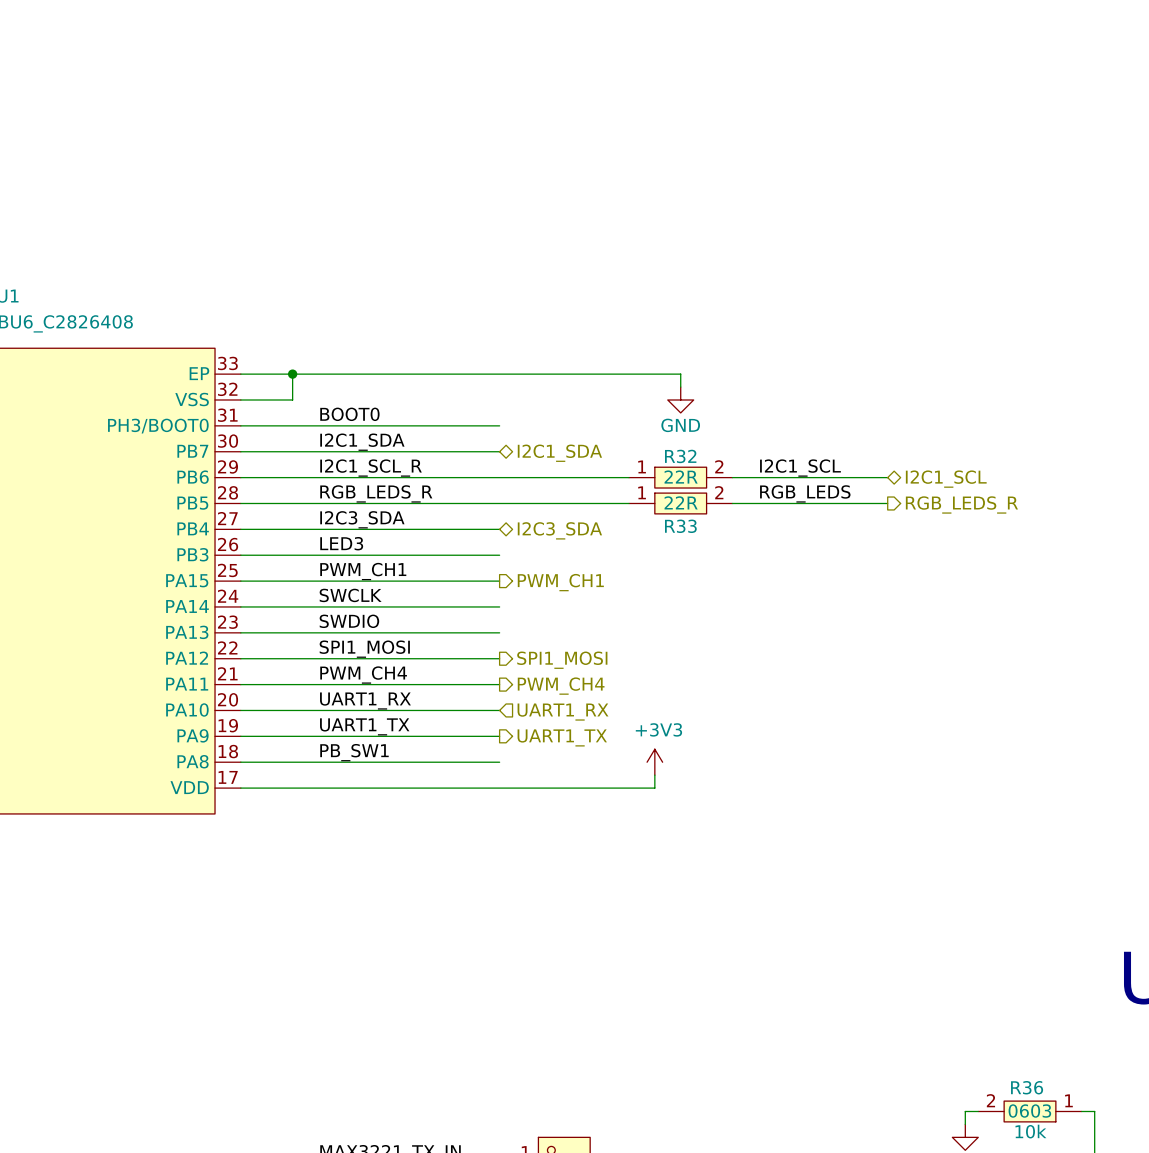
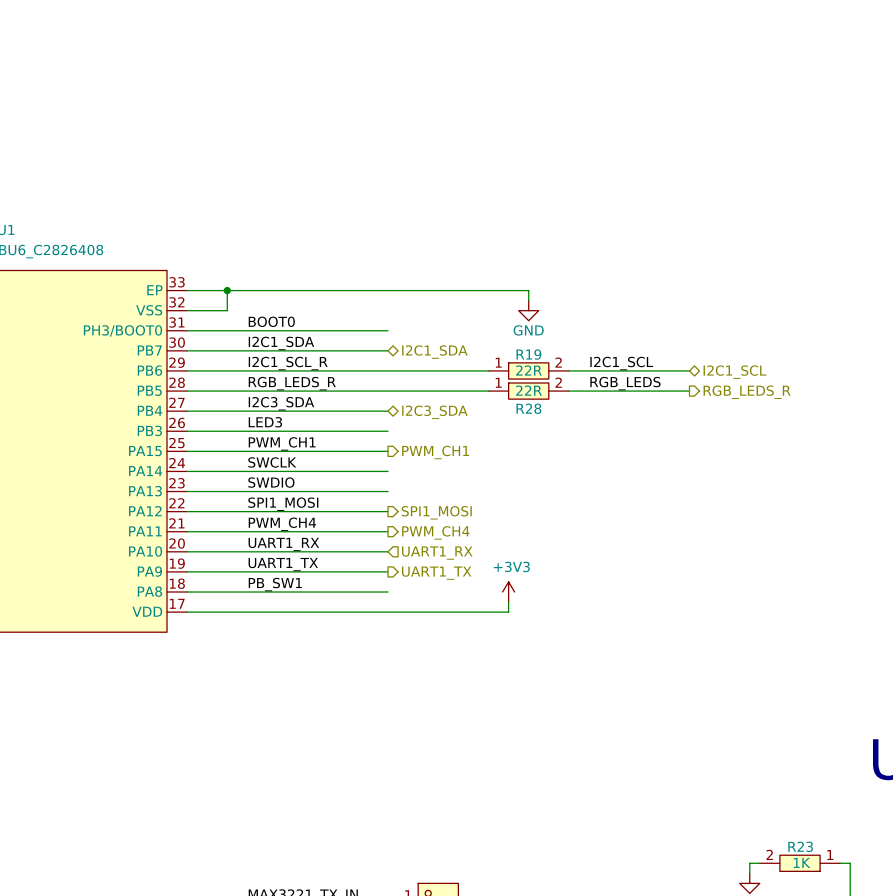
R32 name: R32 (680, 456) -> R19 (528, 354)
R33 name: R33 (680, 526) -> R28 (528, 408)
R36 name: R36 (1027, 1087) -> R23 (800, 846)
R36 text: 0603 (1029, 1111) -> none
R36 text: 10k (1030, 1131) -> 1K (802, 862)

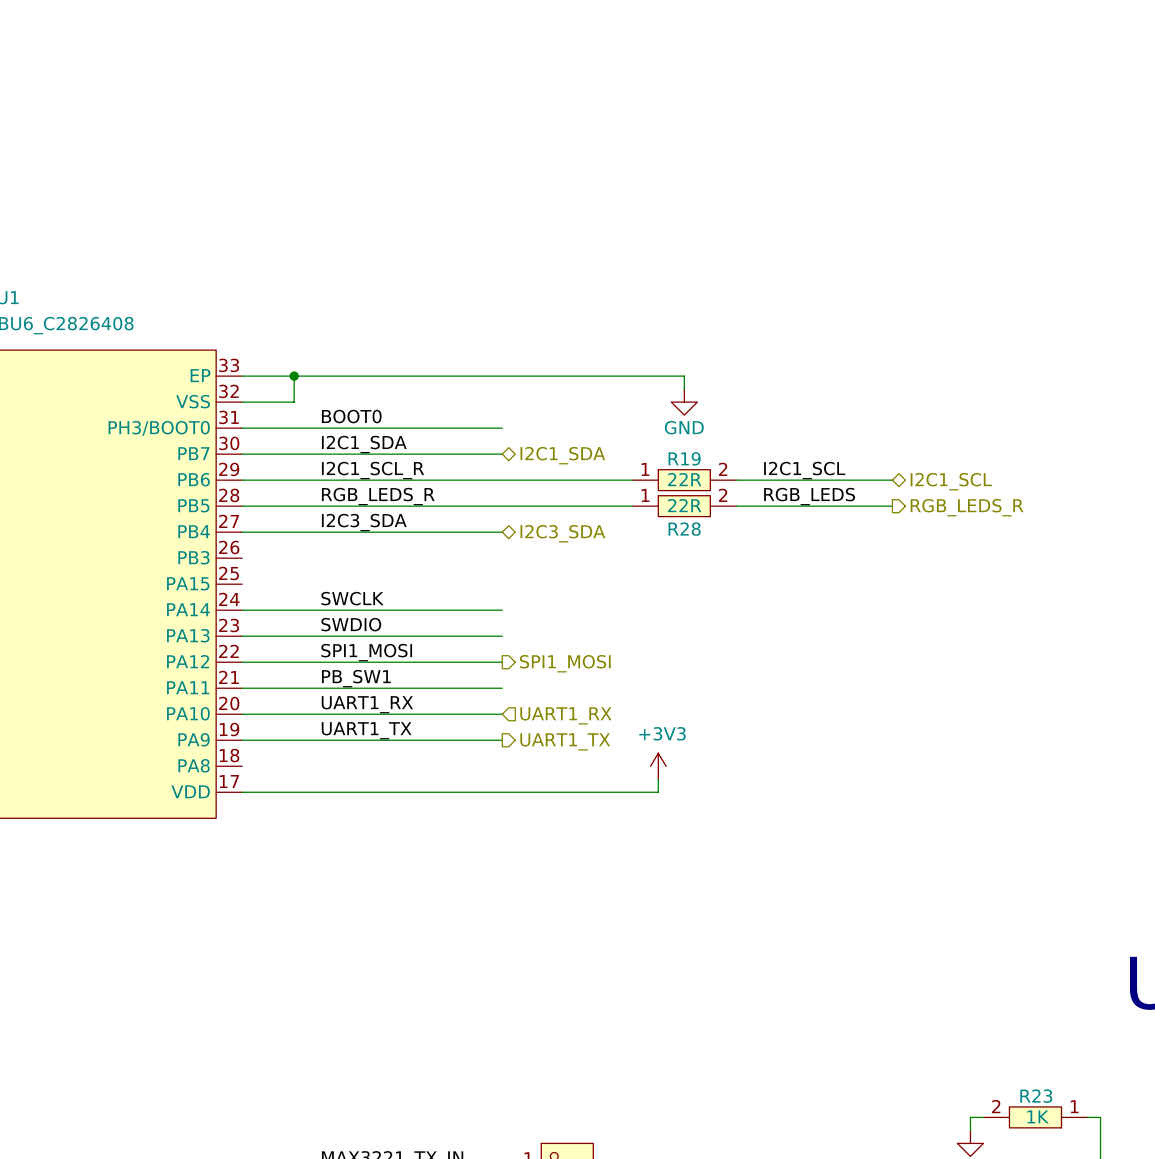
label: LED3 (265, 422) -> none
wire: (187, 431) (388, 431) -> none
label: PWM_CH1 (282, 443) -> none
wire: (187, 451) (388, 451) -> none
hierarchical label: PWM_CH1 (435, 452) -> none
label: PWM_CH4 (282, 524) -> PB_SW1 (356, 678)
hierarchical label: PWM_CH4 (435, 532) -> none
label: PB_SW1 (275, 584) -> none
wire: (187, 592) (388, 592) -> none

